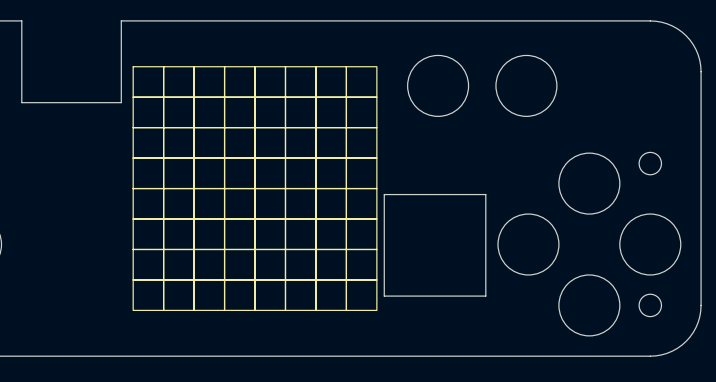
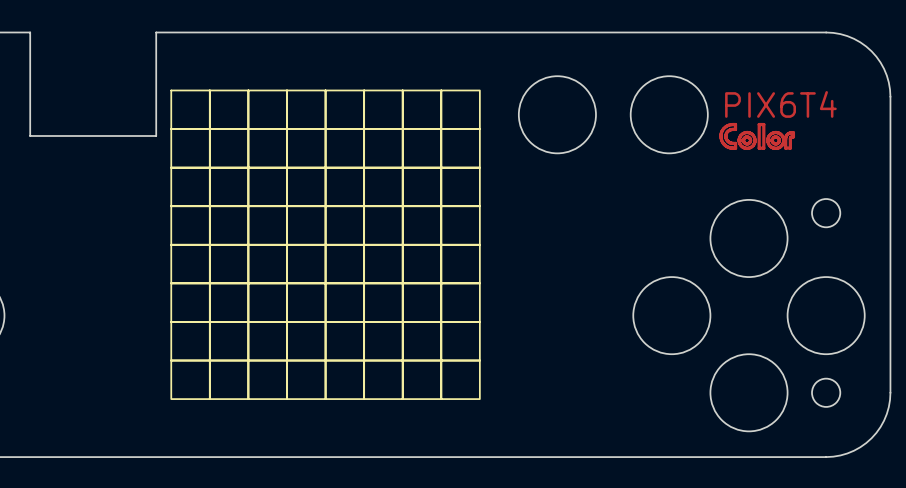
text: none -> PIX6T4 (780, 104)
top track: none -> (759, 124) (759, 148) (763, 148) (763, 124) (759, 124)
top track: none -> (792, 132) (786, 136) (785, 148) (790, 148) (790, 138) (793, 136) (792, 132)
top track: none -> (720, 136) (725, 127) (735, 124) (735, 129) (728, 130) (725, 135) (728, 141) (735, 143) (735, 148) (733, 148)
top track: none -> (720, 136) (724, 144) (732, 148)
top track: none -> (739, 140) (741, 146) (747, 148) (753, 145) (755, 140) (752, 134) (747, 132) (741, 135) (739, 140)
top track: none -> (743, 140) (747, 143) (750, 140) (747, 136) (743, 140)
top track: none -> (767, 140) (770, 146) (775, 148) (781, 145) (783, 140) (781, 134) (775, 132) (769, 135) (767, 140)
top track: none -> (772, 140) (775, 143) (779, 140) (775, 136) (772, 140)
board edge: (384, 194) (485, 194) (485, 296) (384, 296) (384, 194) -> none

